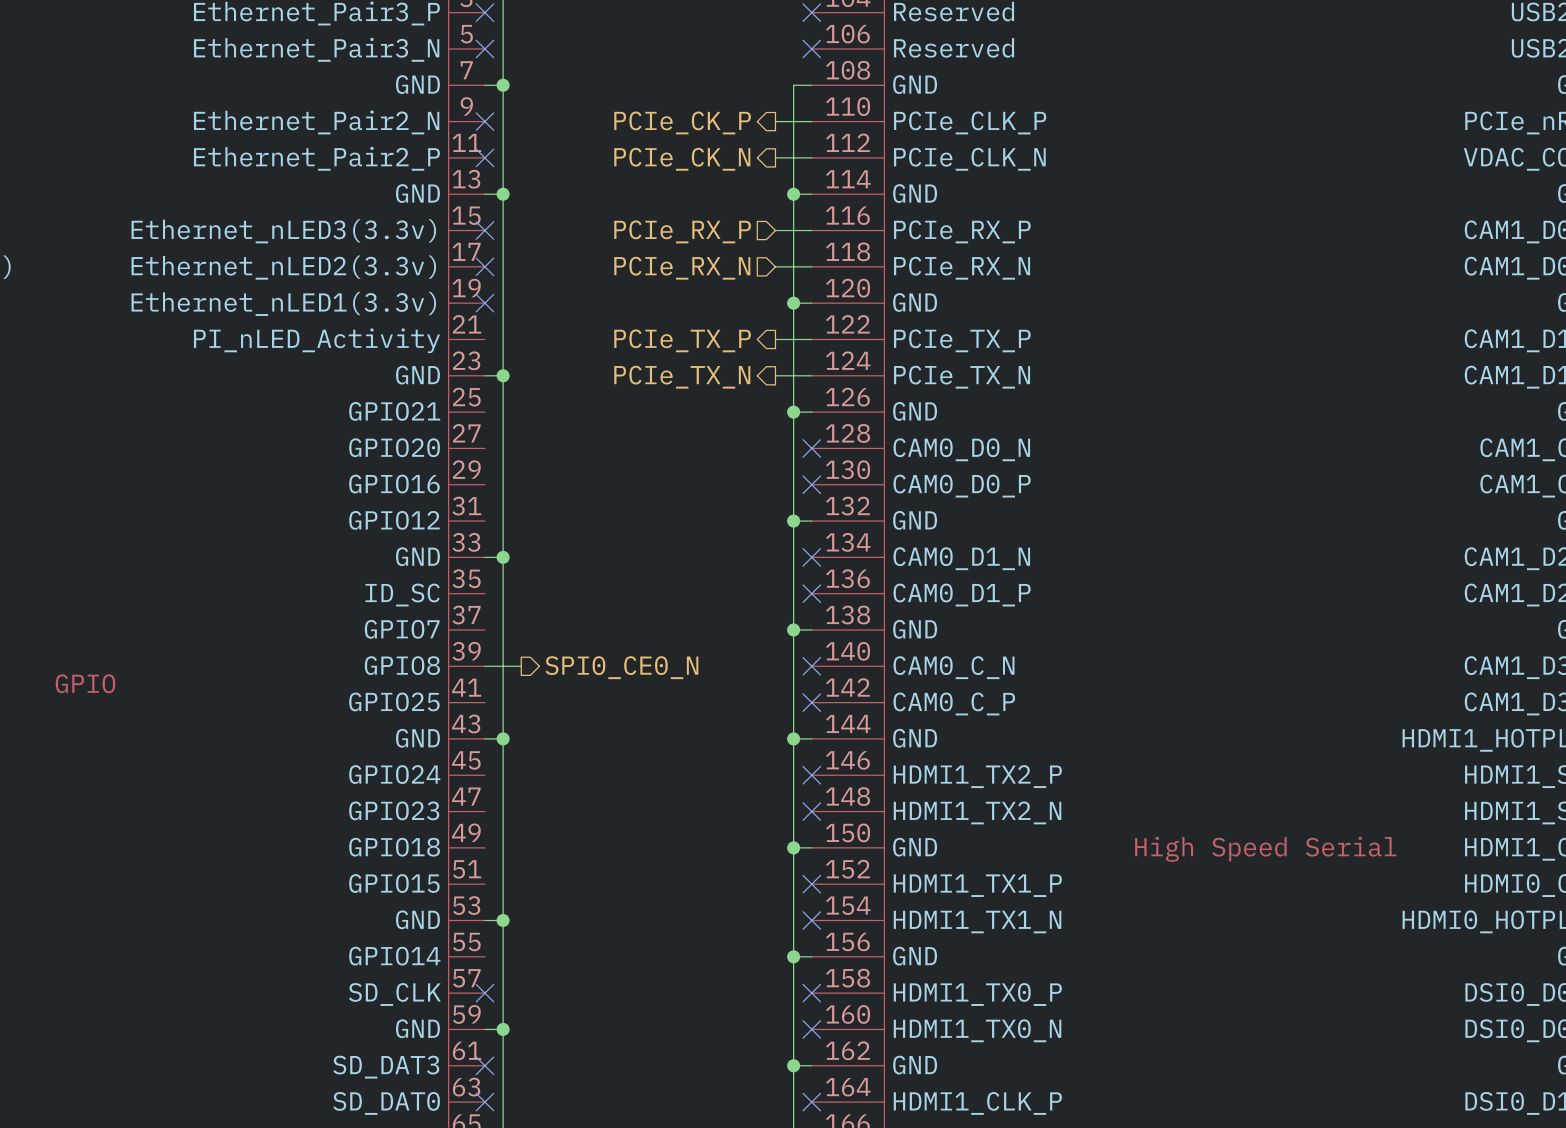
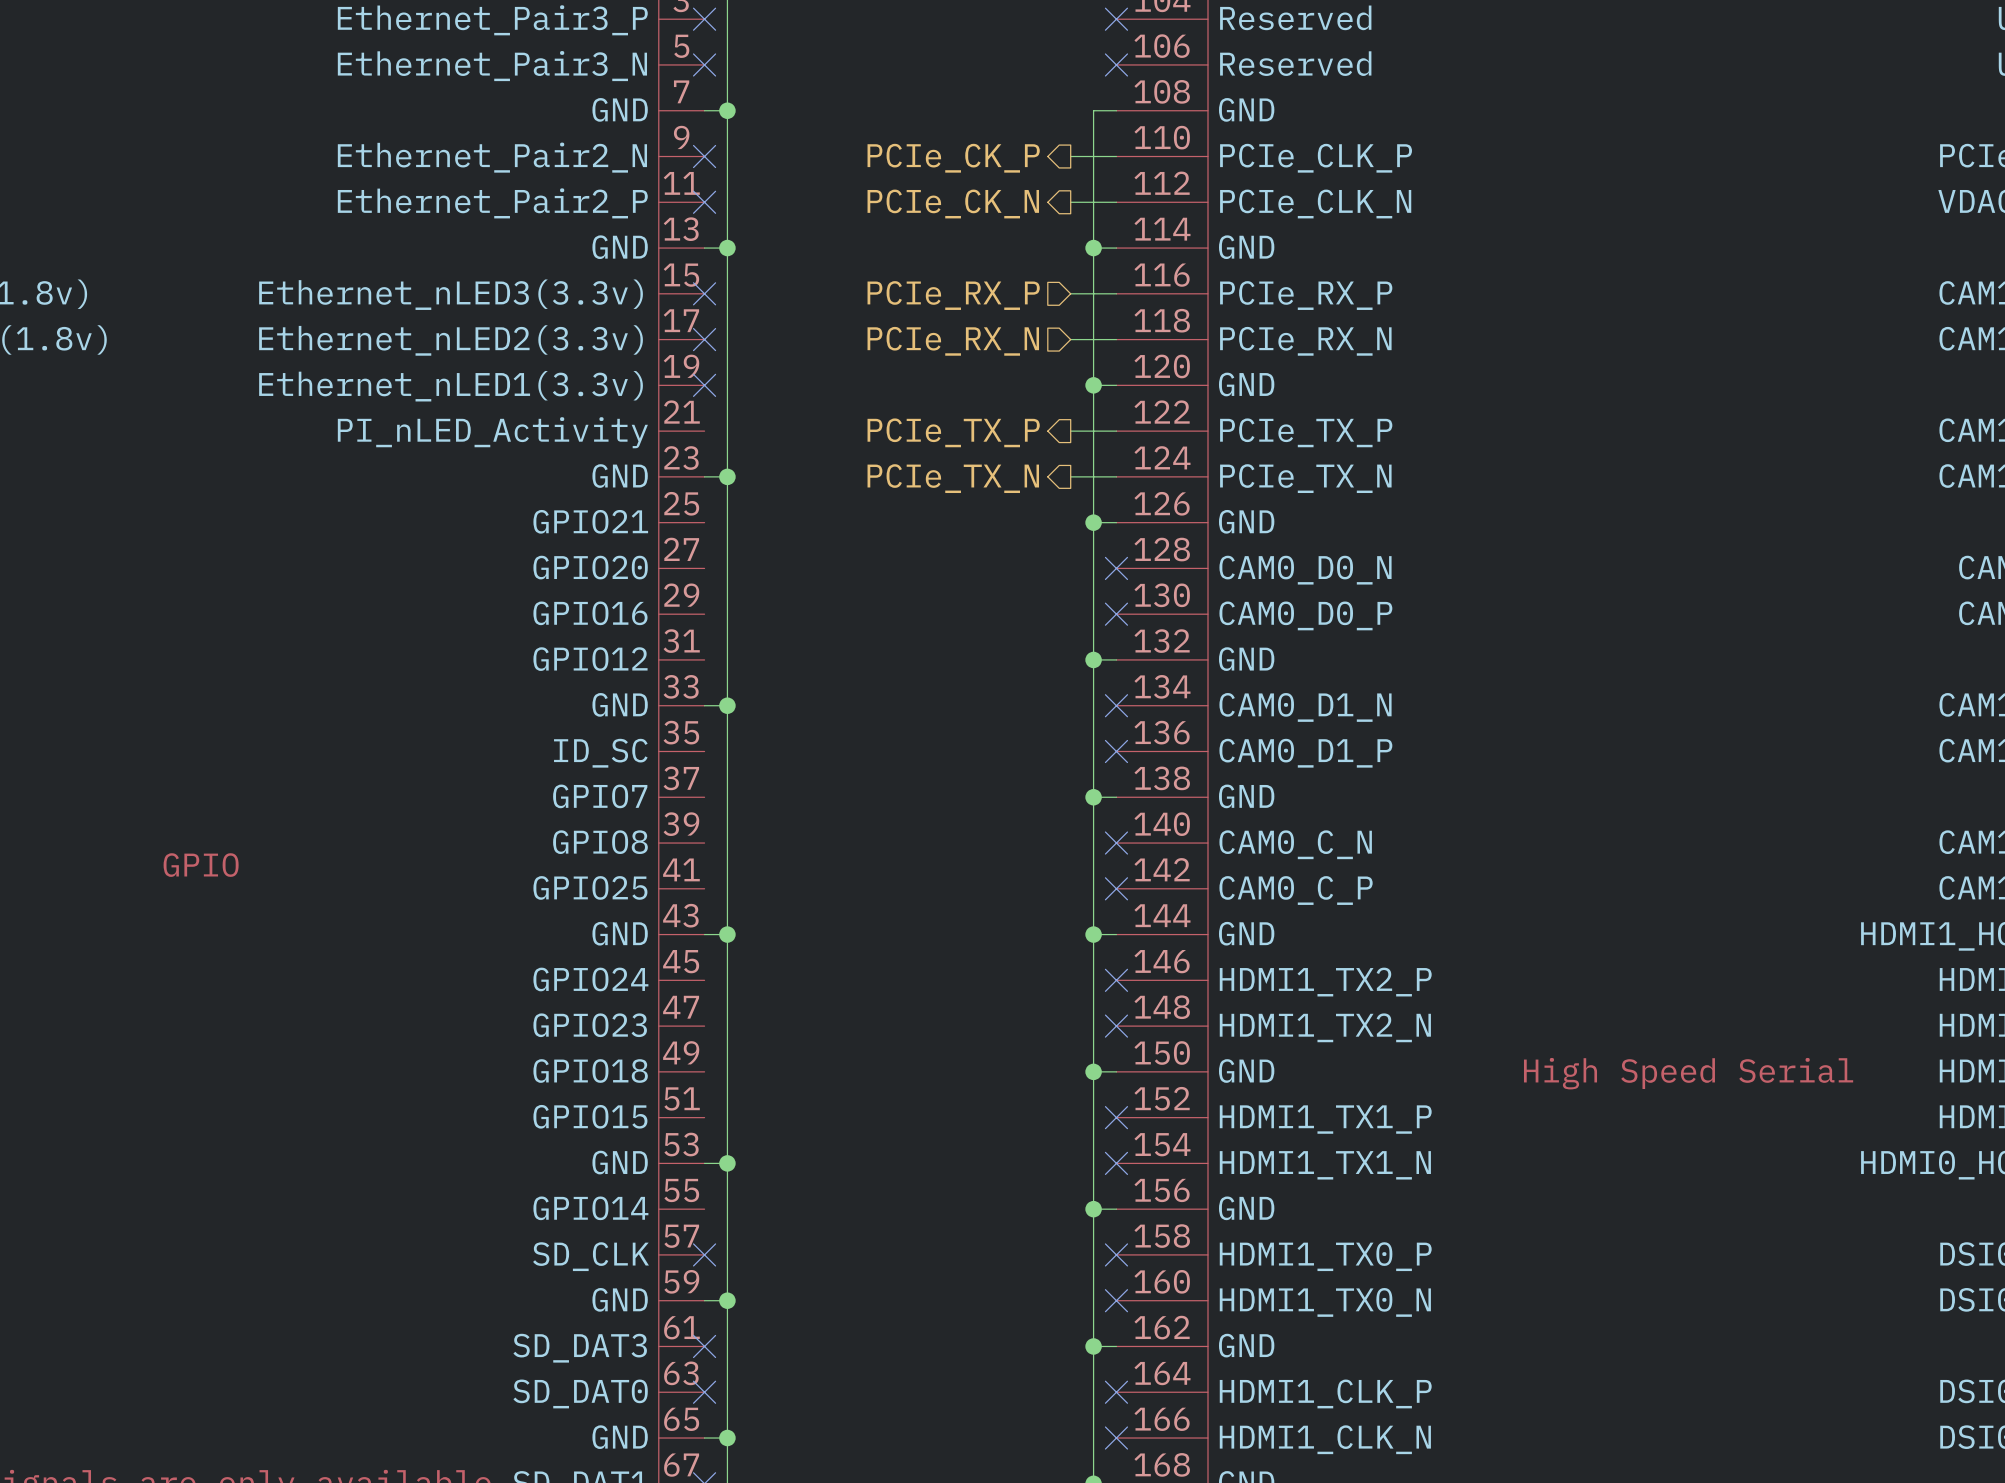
wire: (484, 666) (521, 666) -> none
hierarchical label: SPI0_CE0_N (621, 667) -> none

